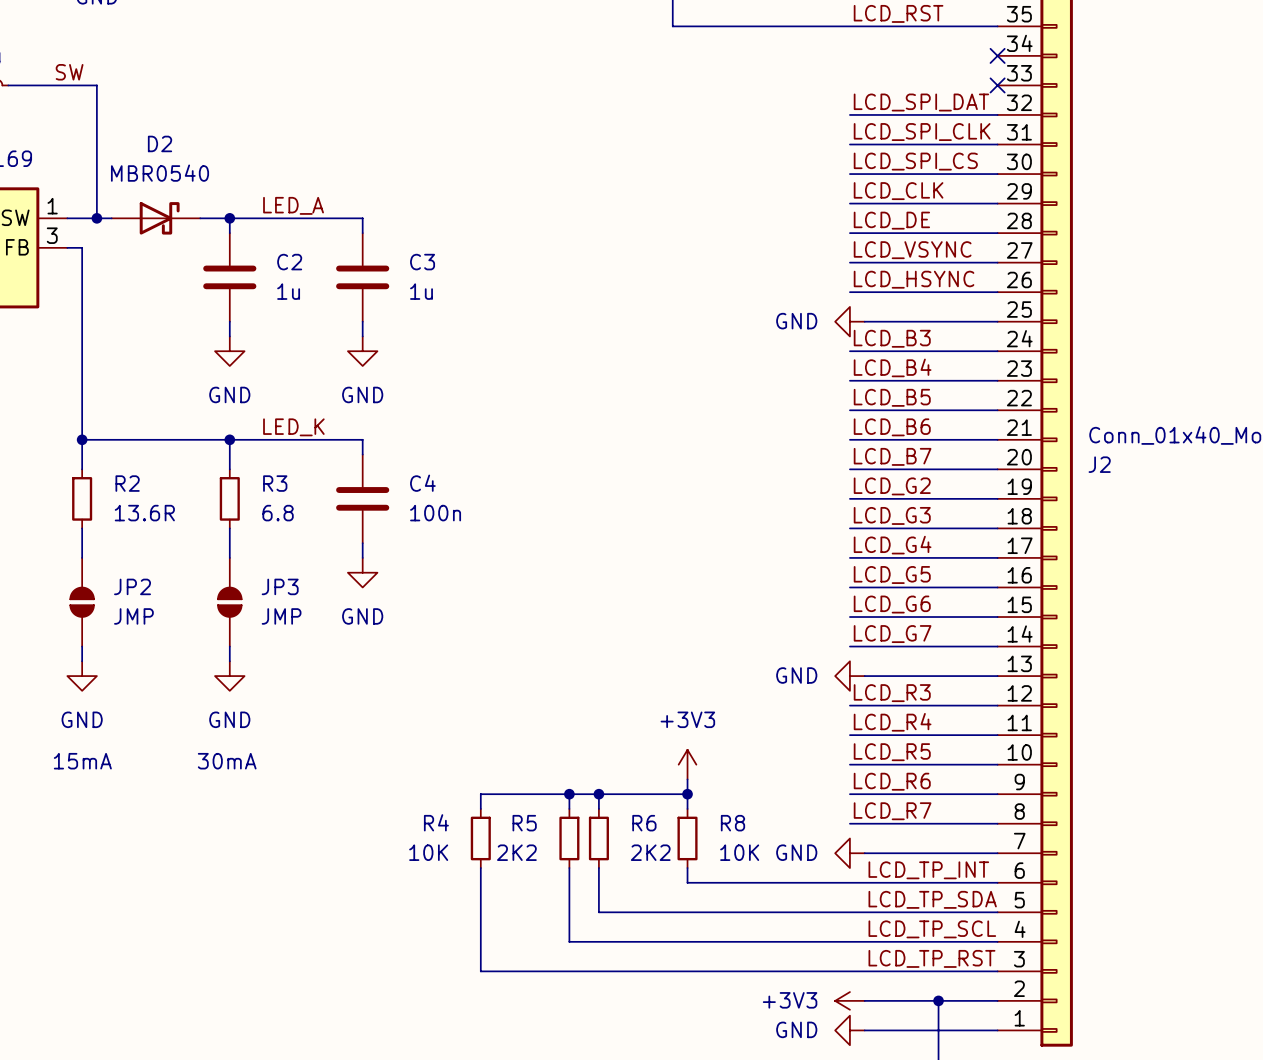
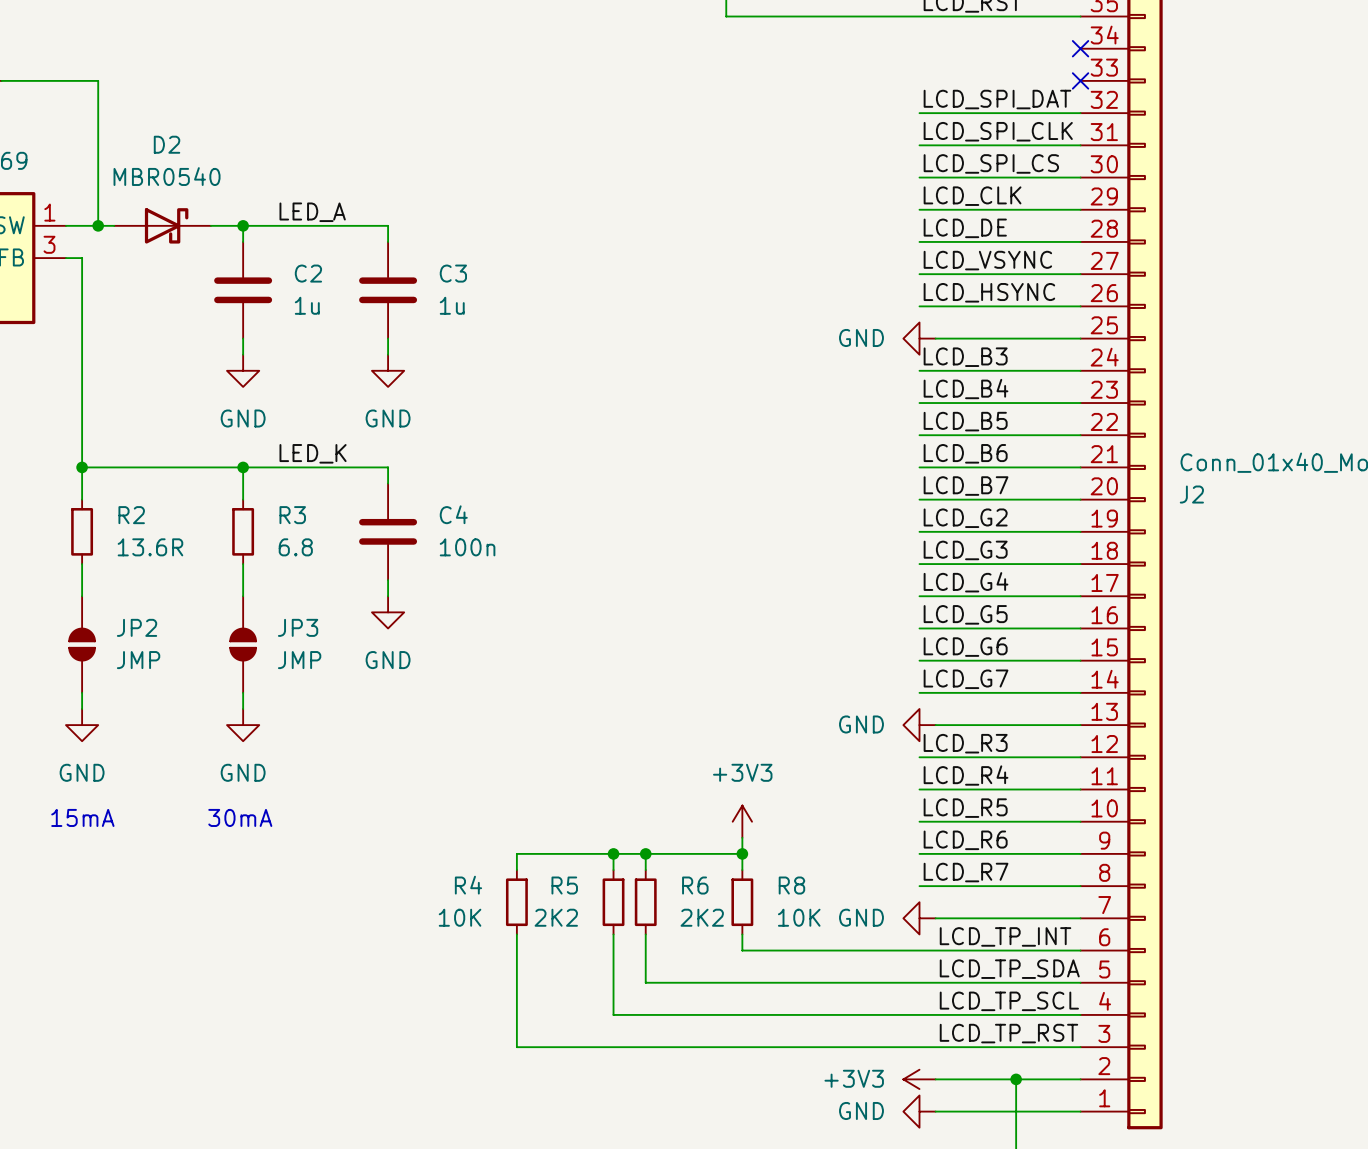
label: SW (69, 72) -> none

